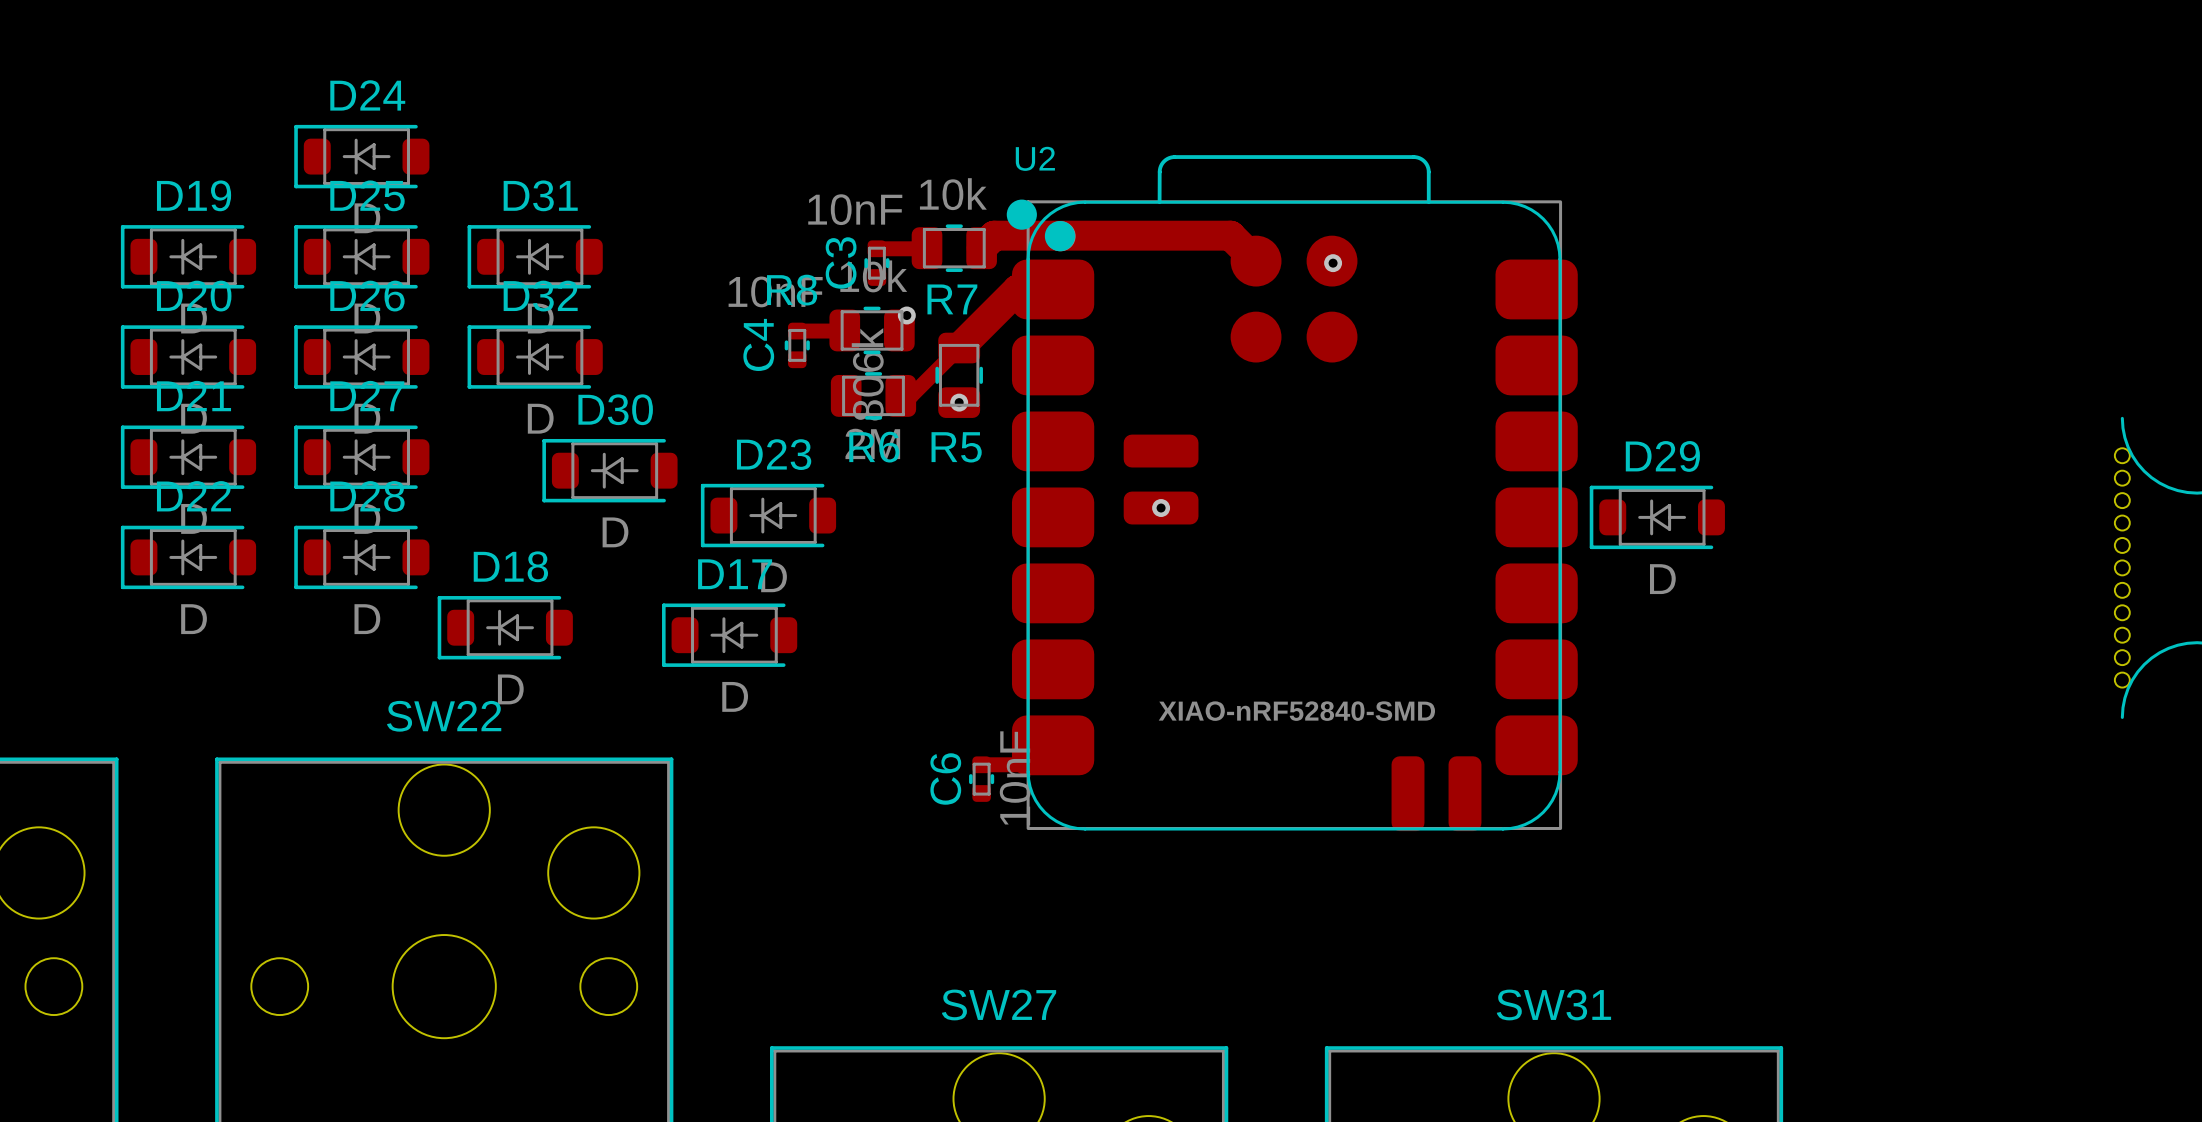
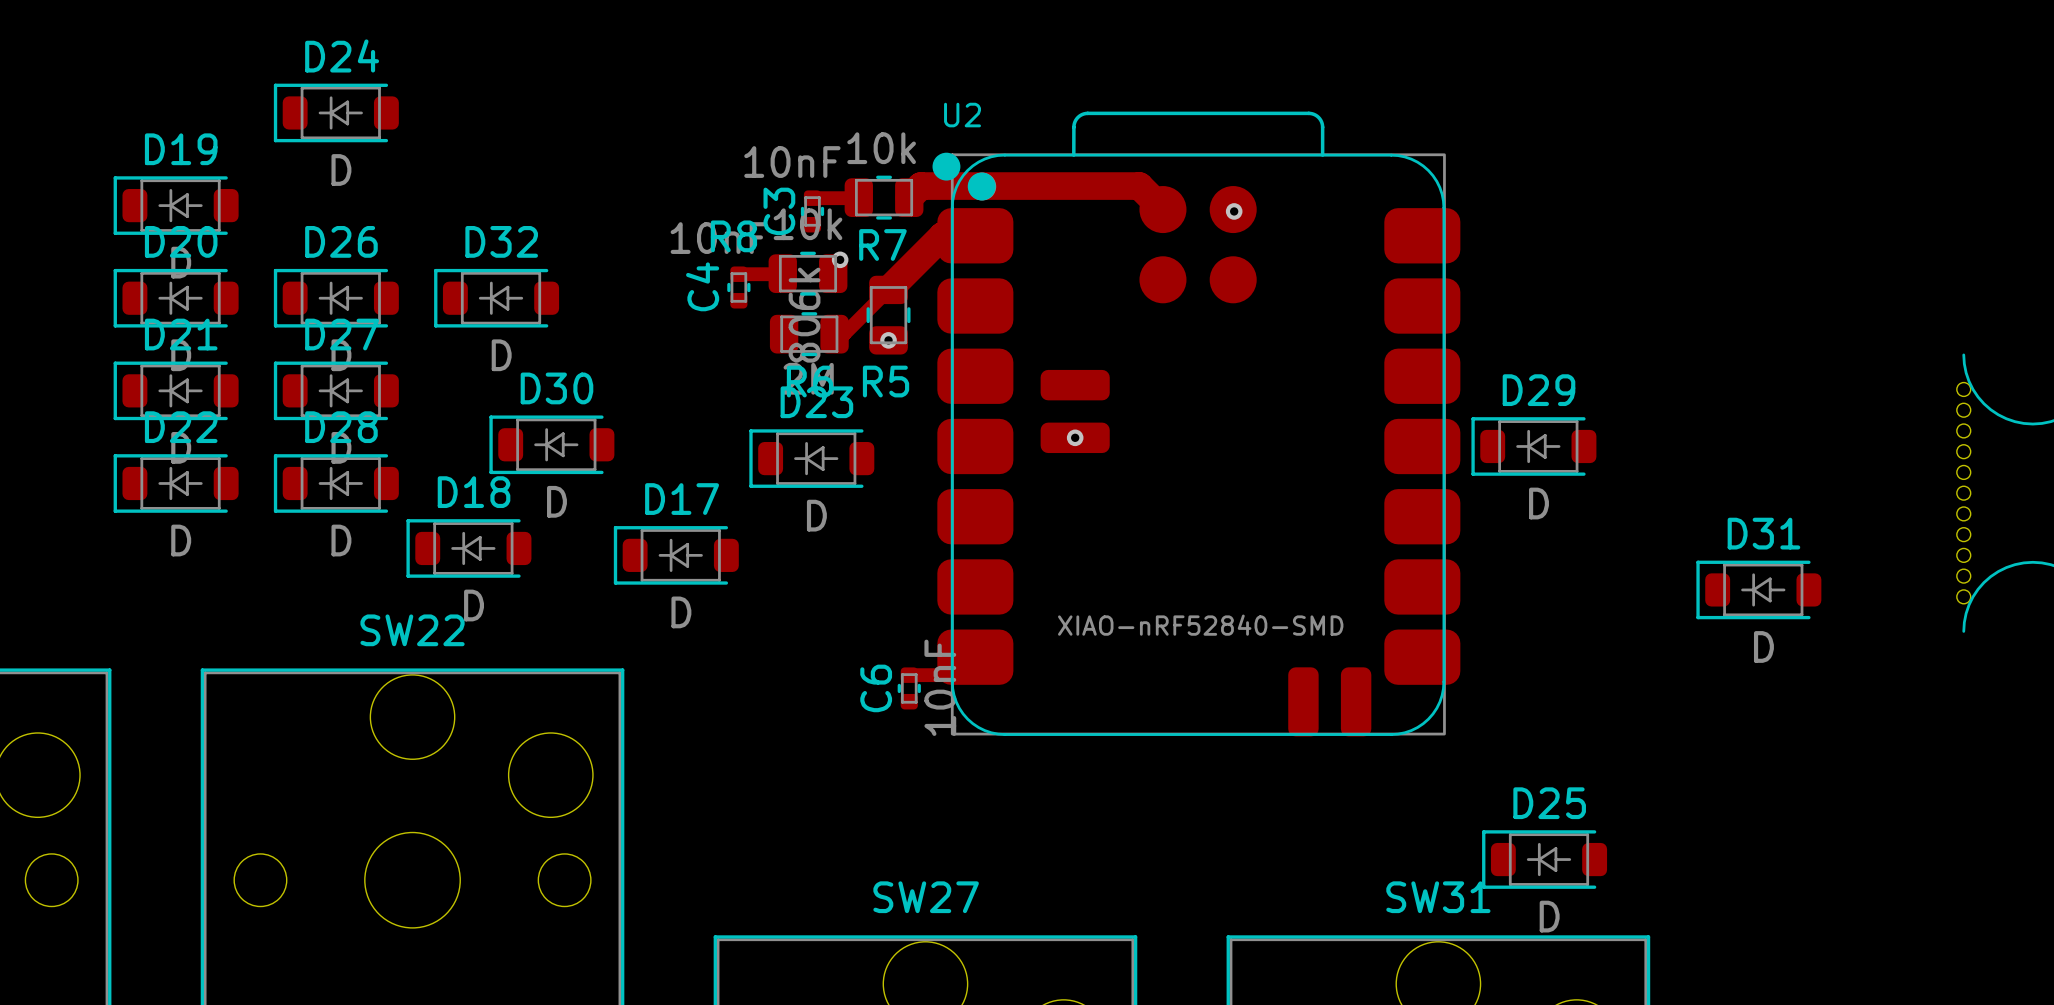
D25 position: (361, 256) -> (1544, 859)
D31 position: (535, 256) -> (1758, 589)
D30 position: (609, 470) -> (551, 444)
D23 position: (768, 515) -> (811, 458)

